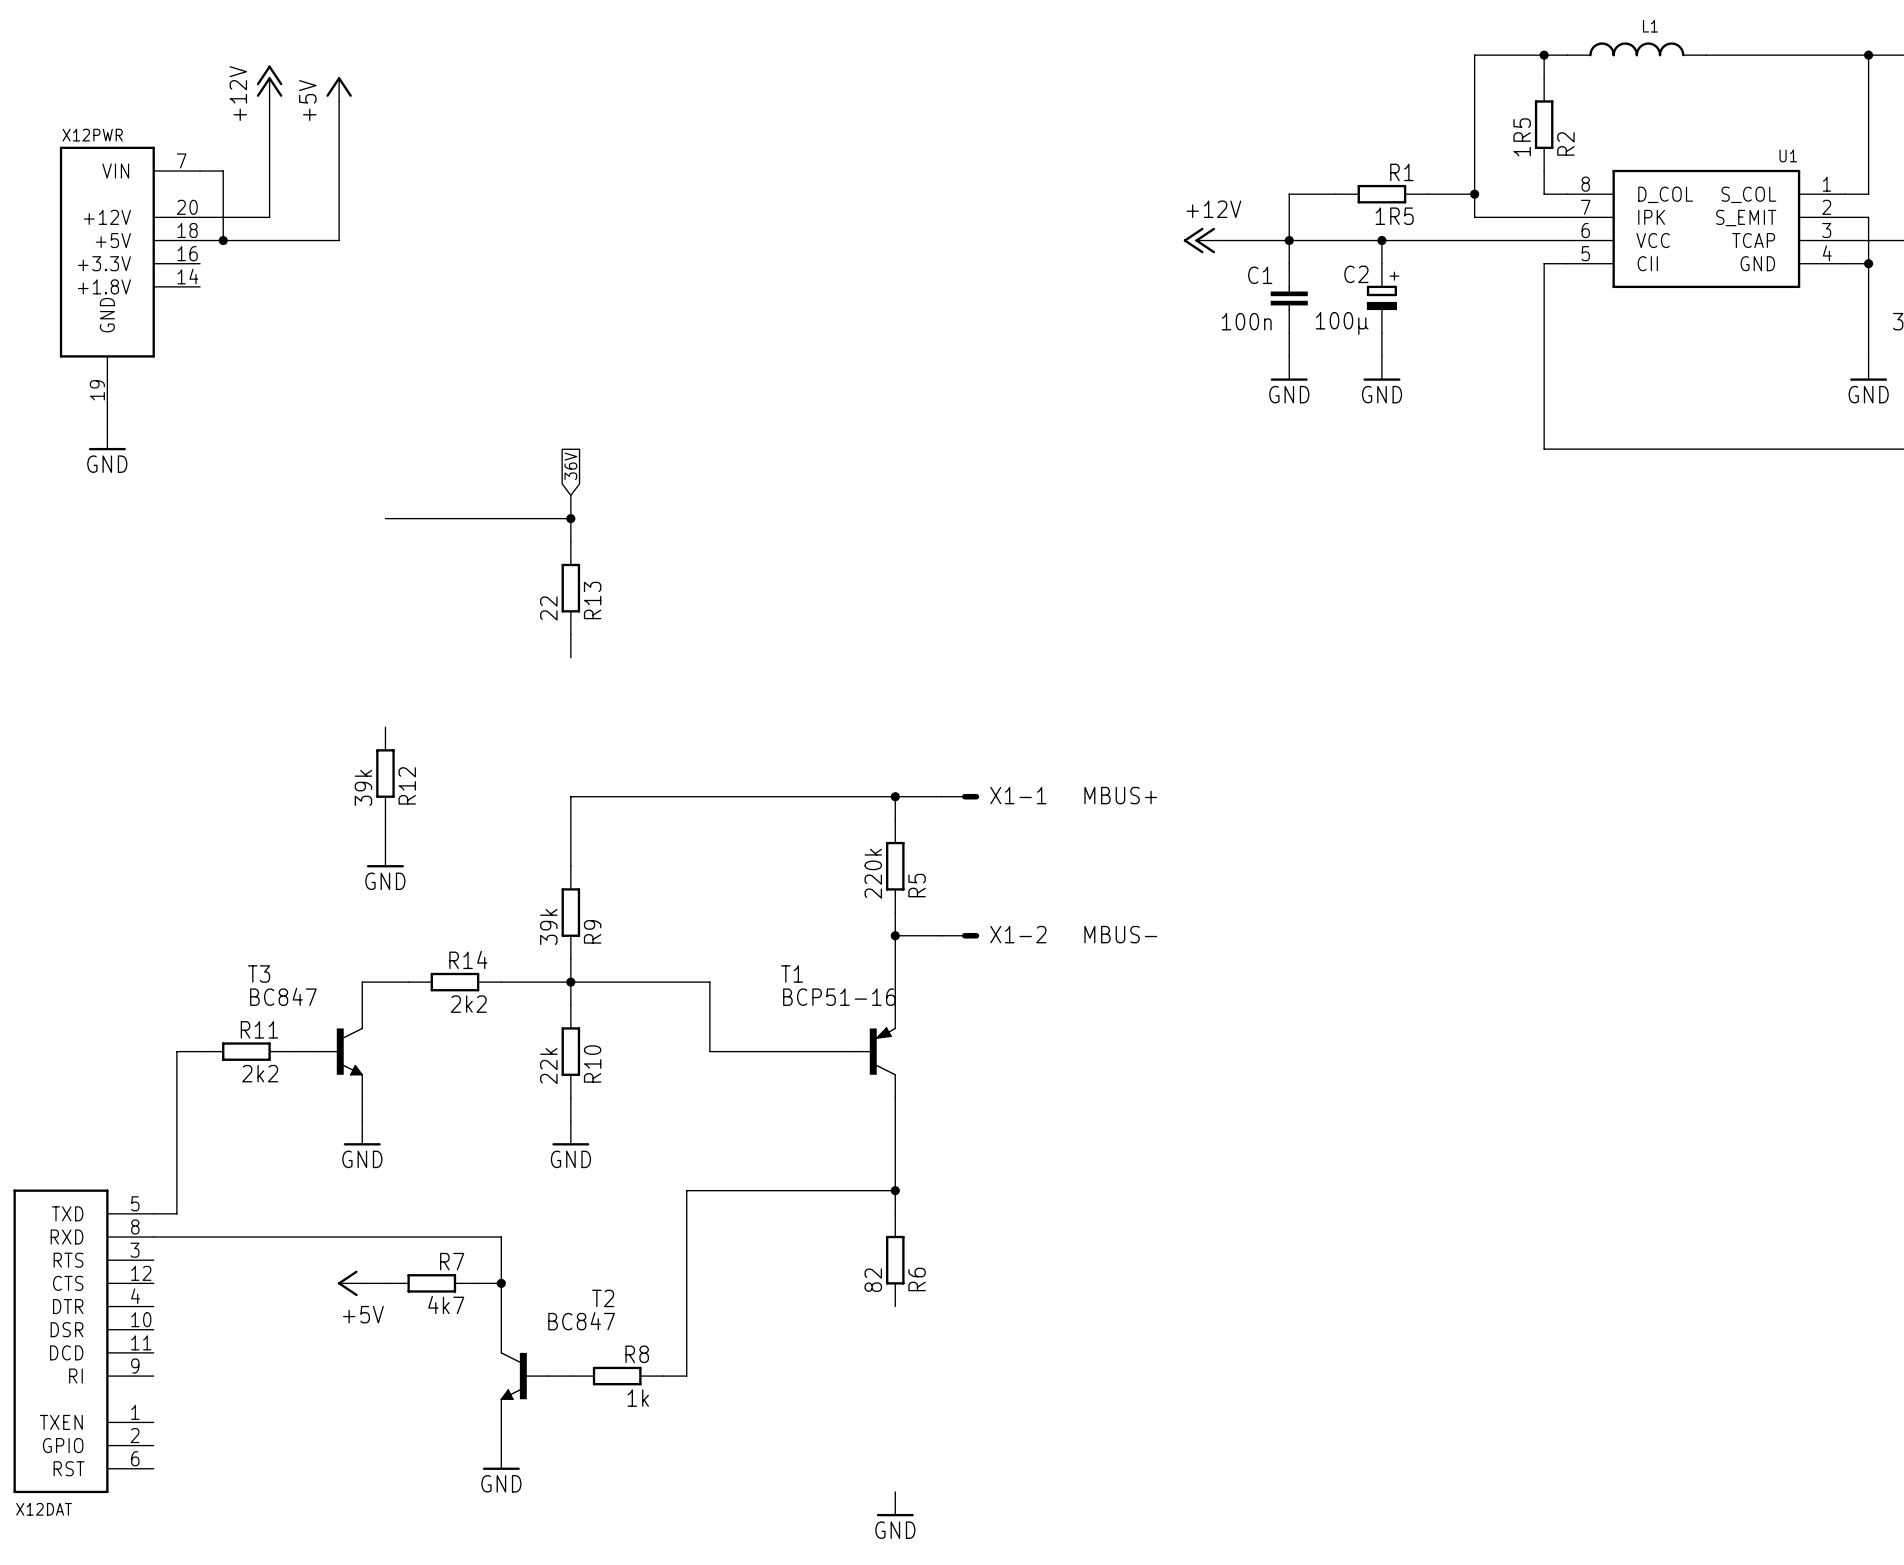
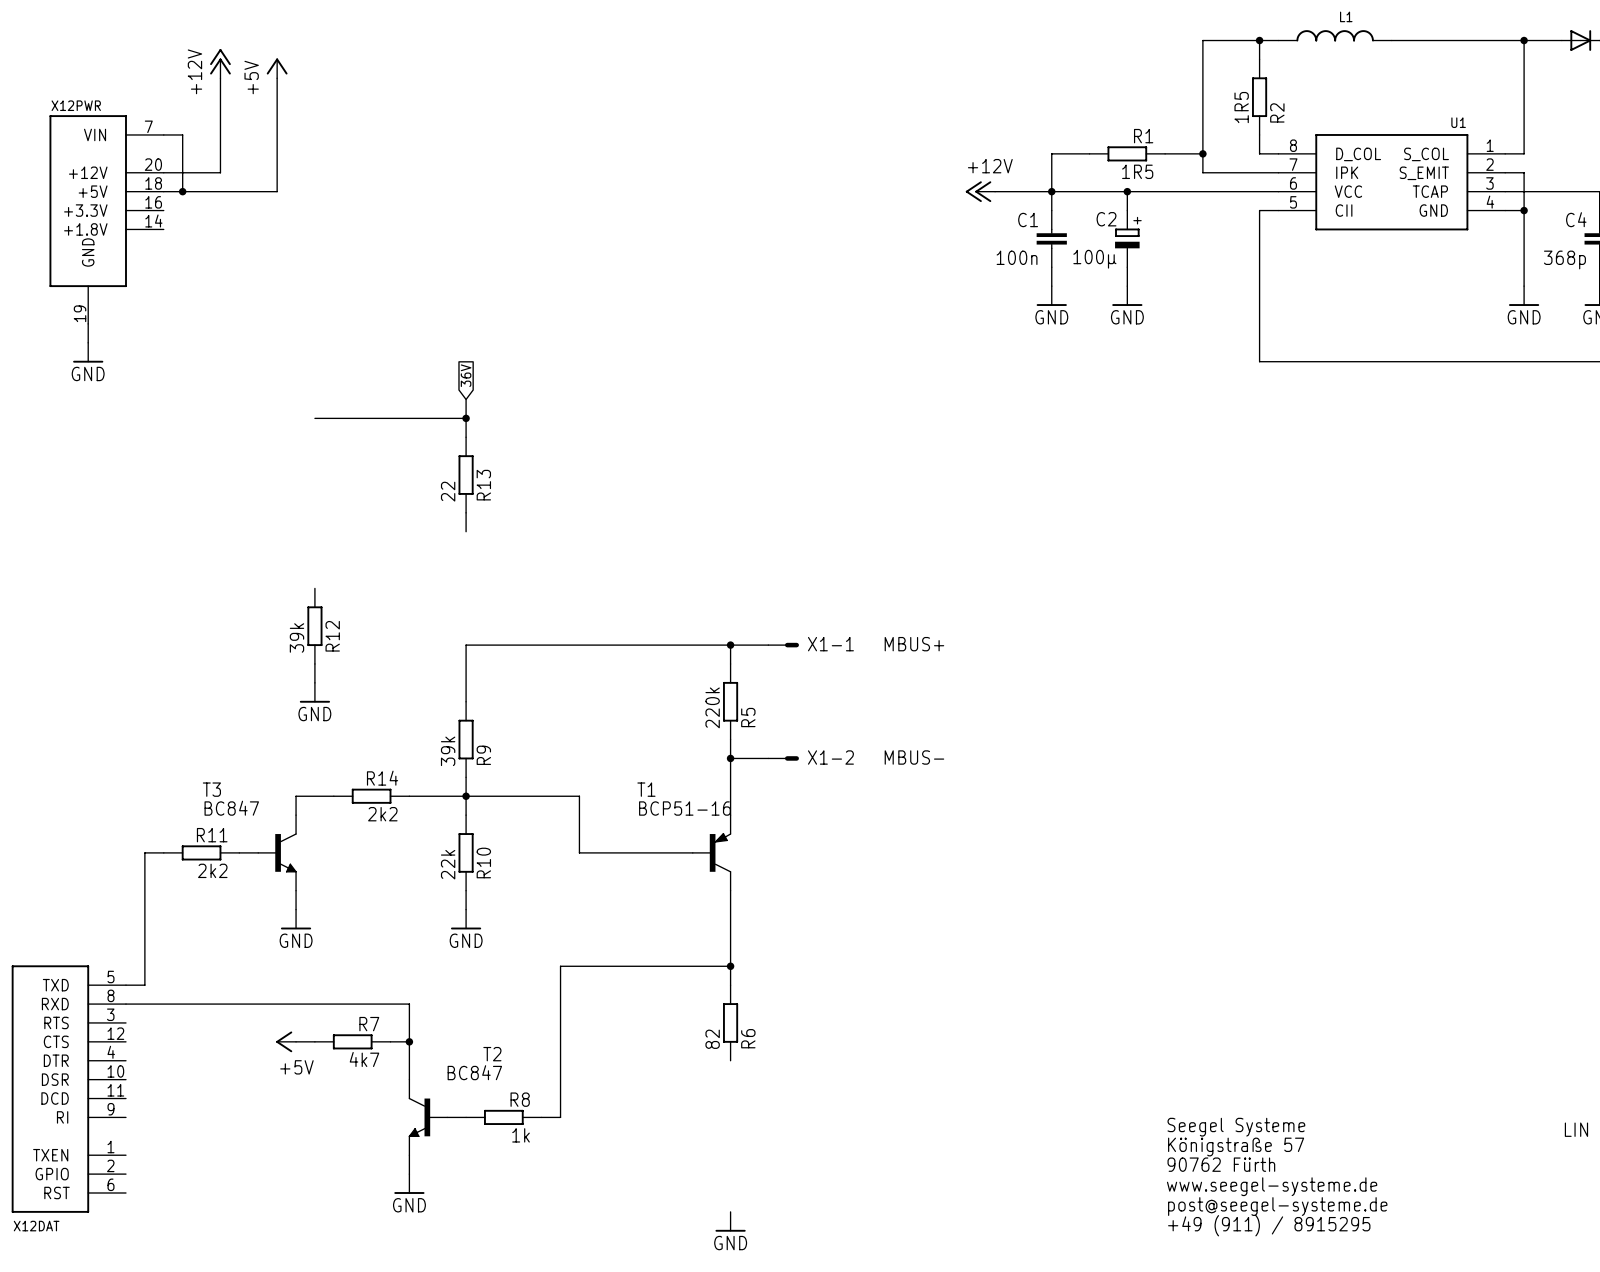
text: none -> Seegel Systeme (1236, 1127)
text: none -> Königstraße 57 (1236, 1147)
text: none -> 90762 Fürth (1221, 1164)
text: none -> www.seegel-systeme.de (1272, 1186)
text: none -> post@seegel-systeme.de (1277, 1206)
text: none -> +49 (911) / 8915295 (1269, 1225)

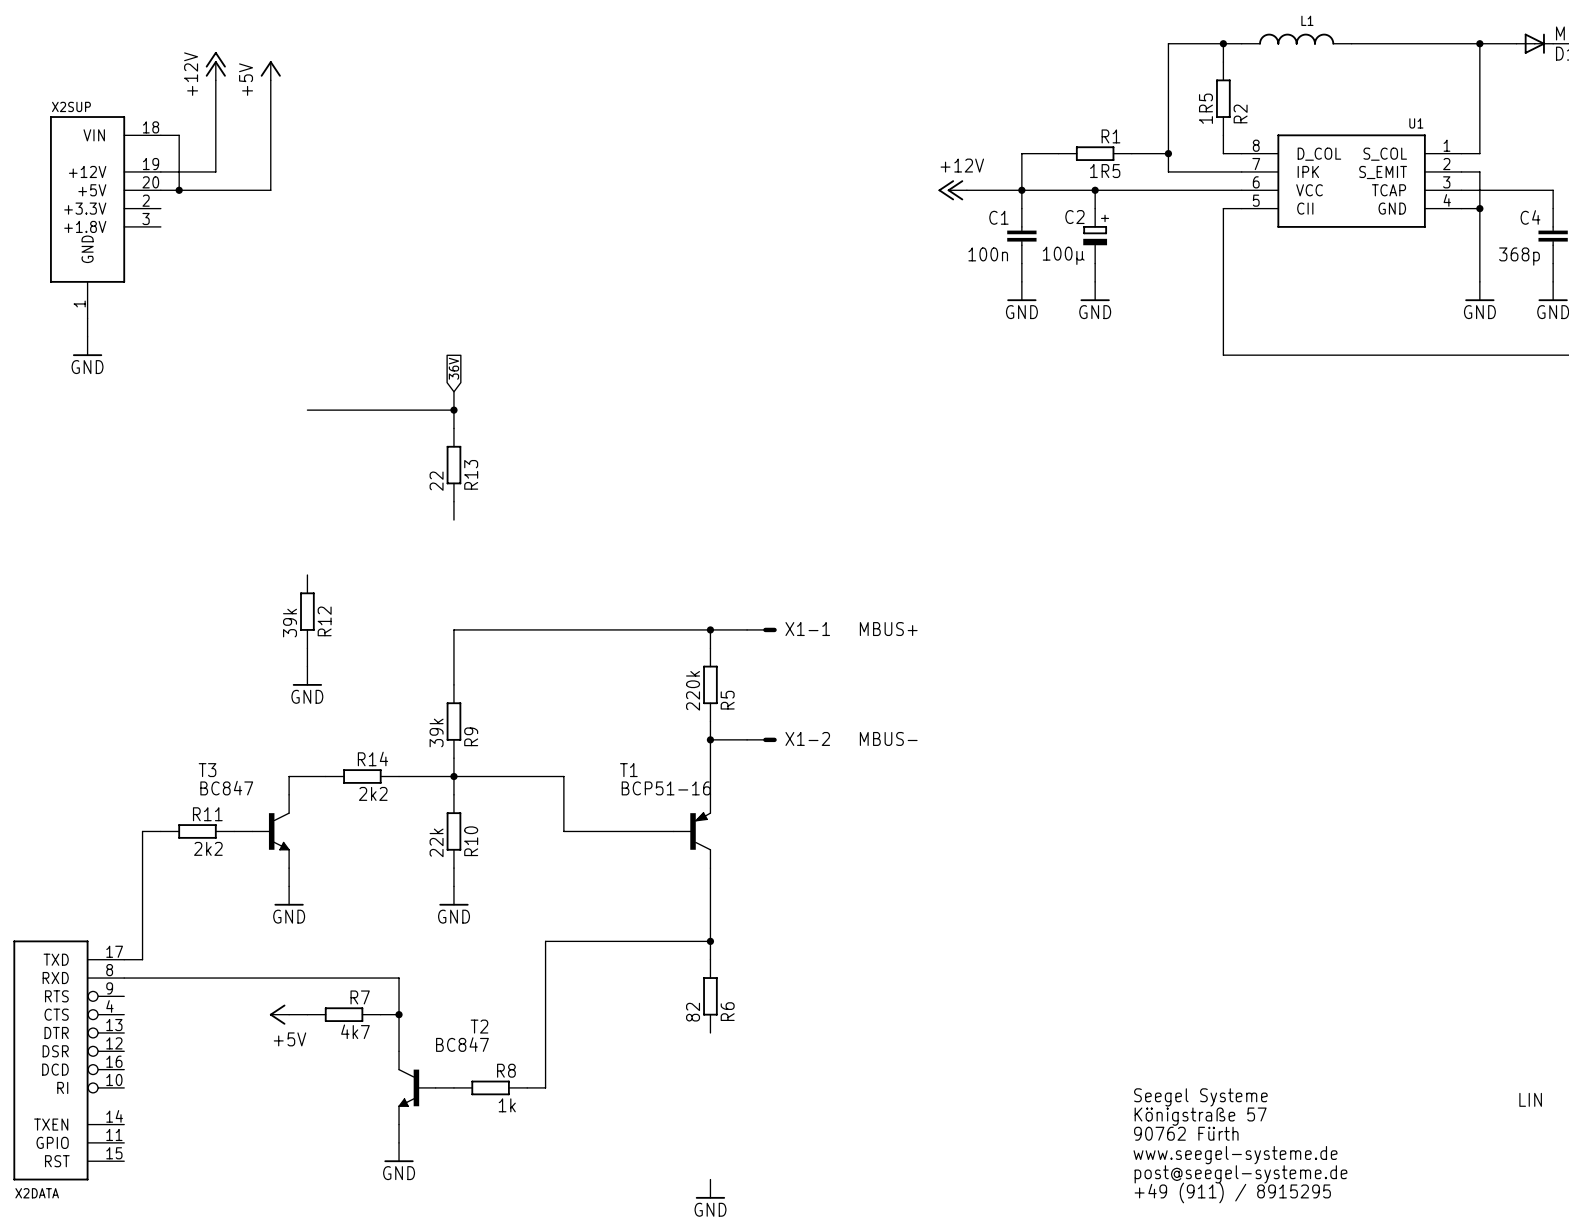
X12PWR name: X12PWR (76, 105) -> X2SUP (71, 106)
X12PWR pin number: 7 (148, 126) -> 18 (151, 127)
X12PWR pin number: 20 (153, 164) -> 19 (151, 164)
X12PWR pin number: 18 (153, 183) -> 20 (150, 182)
X12PWR pin number: 16 (153, 202) -> 2 (146, 200)
X12PWR pin number: 14 (153, 220) -> 3 (146, 218)
X12PWR pin number: 19 (80, 313) -> 1 (79, 303)
X12DAT: (68, 1089) -> none
X2DATA: none -> (68, 1060)

